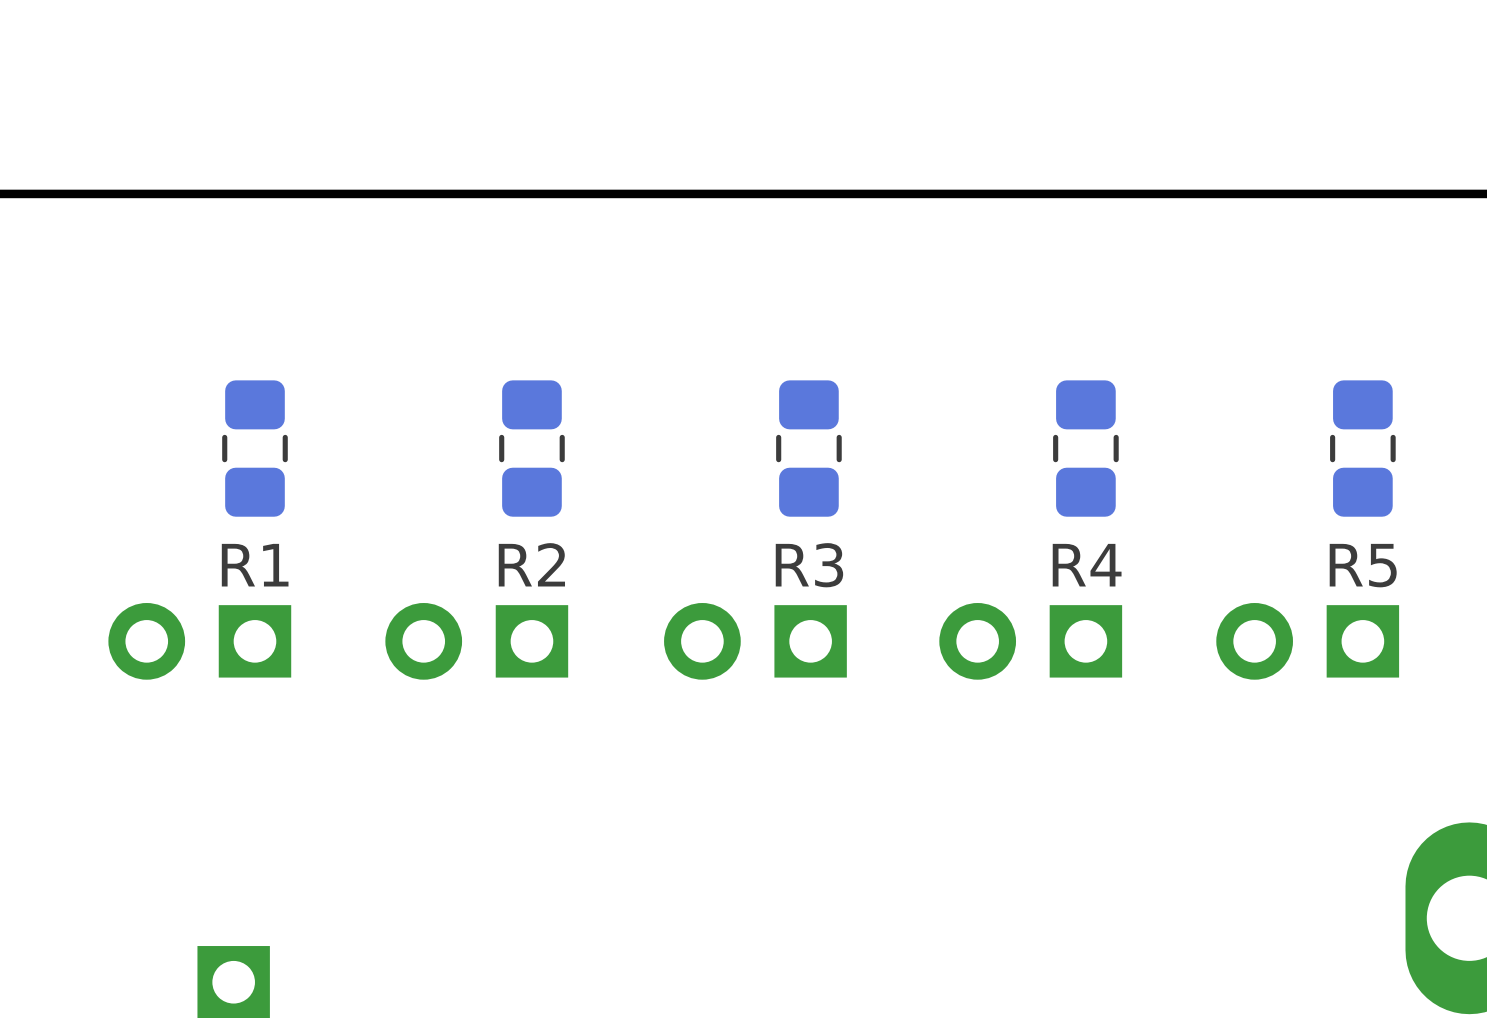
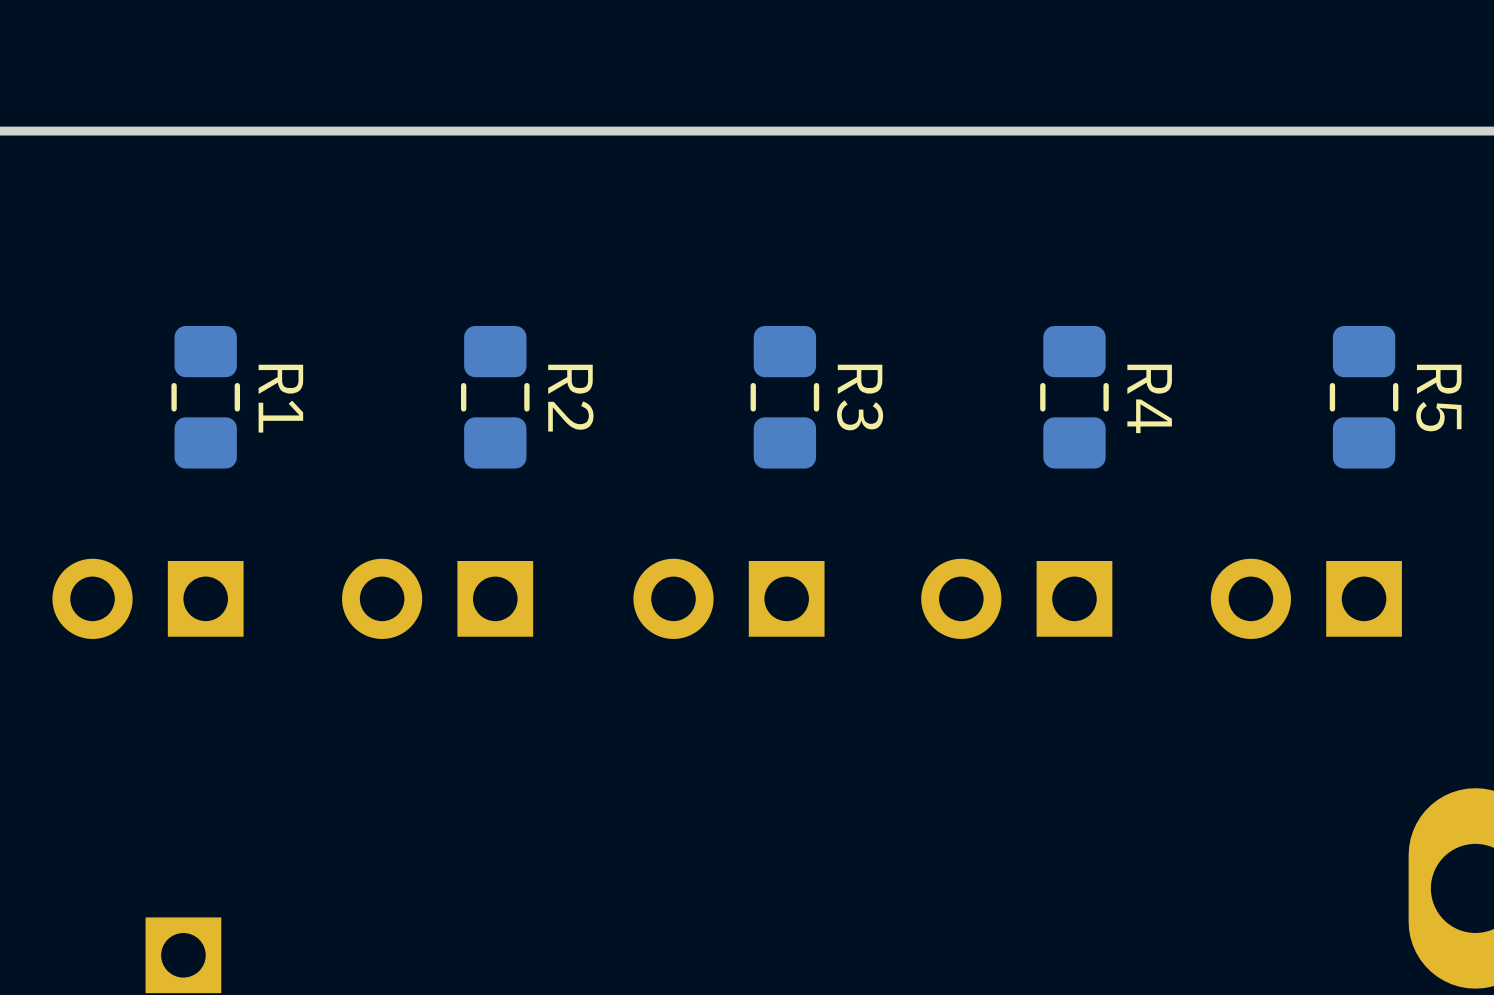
R2 name rotation: 0° (531, 564) -> 90° clockwise (570, 398)
R2 name position: R2 (531, 564) -> R2 (570, 398)
R1 name rotation: 0° (255, 565) -> 90° clockwise (280, 398)
R1 name position: R1 (255, 565) -> R1 (280, 398)
R3 name rotation: 0° (809, 565) -> 90° clockwise (860, 397)
R3 name position: R3 (809, 565) -> R3 (860, 397)
R4 name rotation: 0° (1087, 565) -> 90° clockwise (1149, 398)
R4 name position: R4 (1087, 565) -> R4 (1149, 398)
R5 name rotation: 0° (1363, 565) -> 90° clockwise (1438, 397)
R5 name position: R5 (1363, 565) -> R5 (1438, 397)

